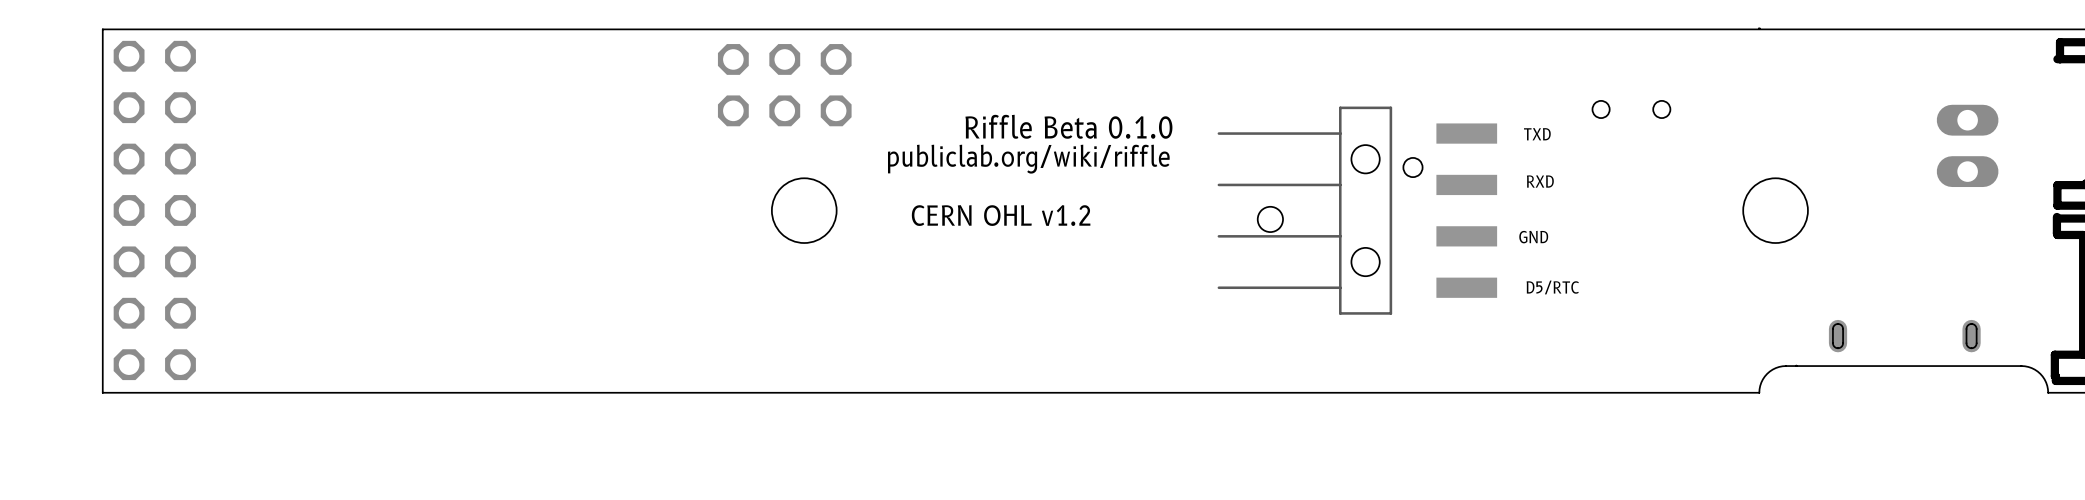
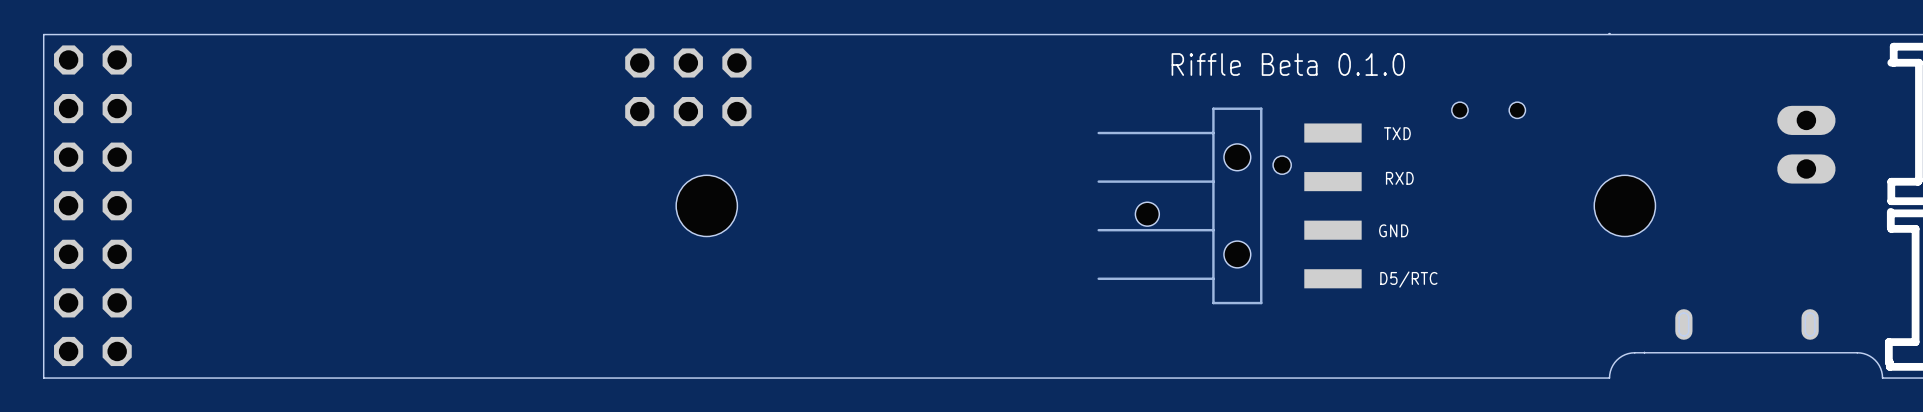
text position: Riffle Beta 0.1.0 (1068, 126) -> Riffle Beta 0.1.0 (1288, 64)
text: publiclab.org/wiki/riffle (1028, 159) -> none
text: CERN OHL v1.2 (1001, 215) -> none

